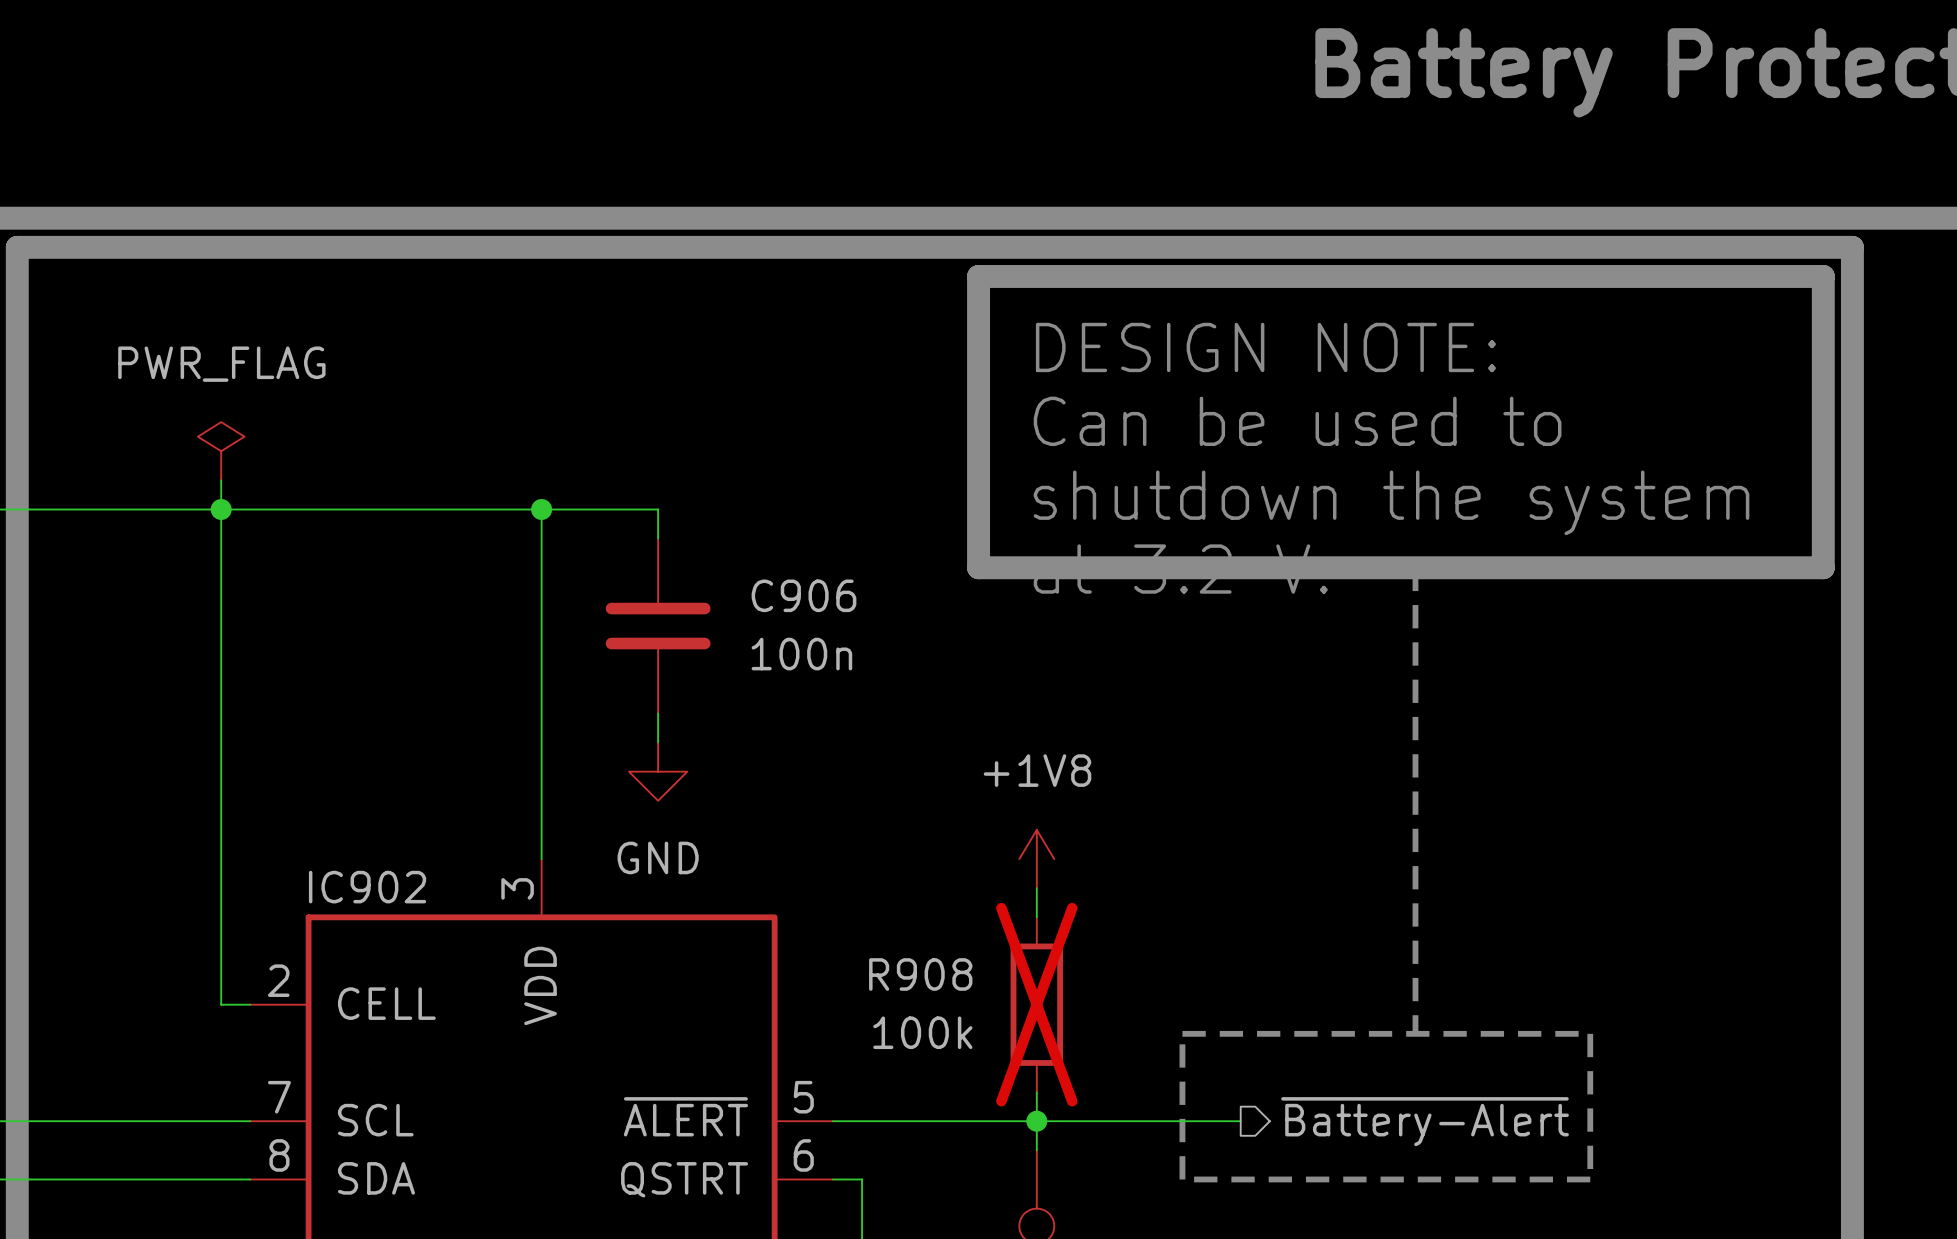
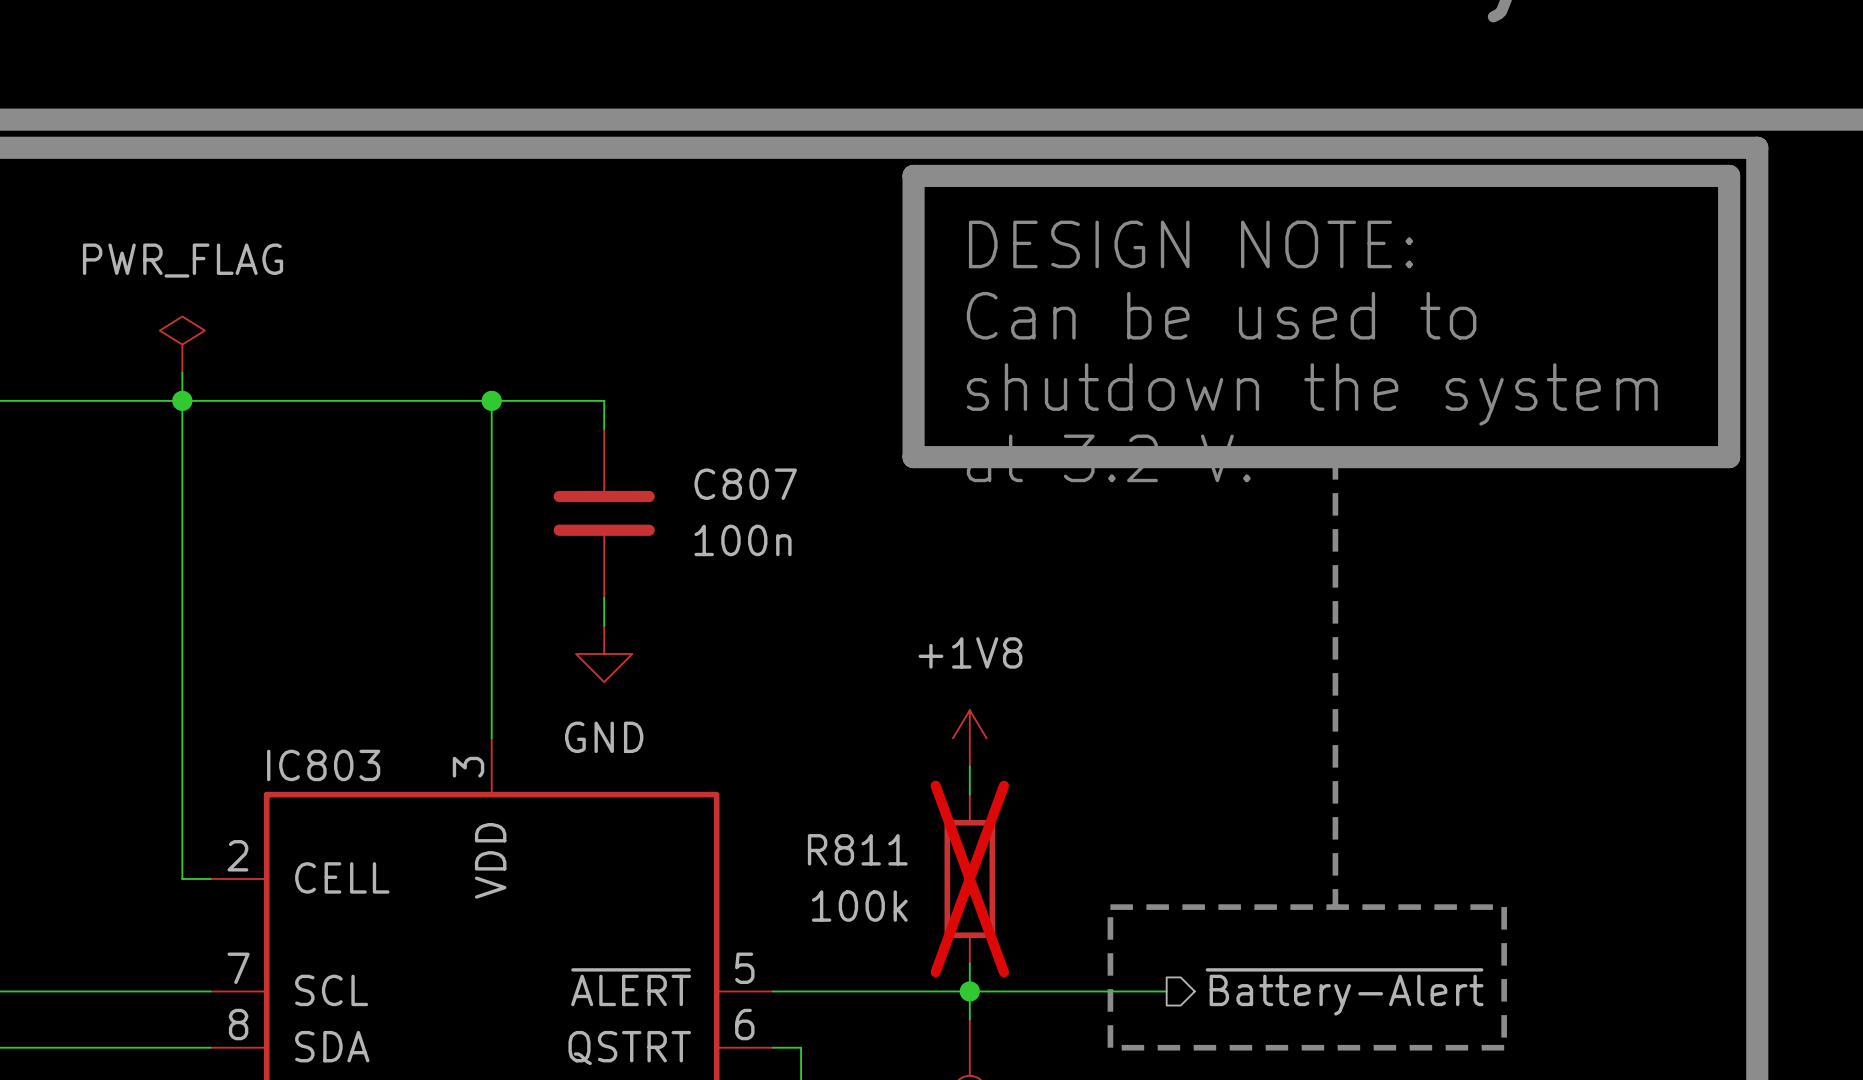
C906 name: C906 (803, 595) -> C807 (745, 484)
IC902 name: IC902 (367, 887) -> IC803 (323, 765)
R908 name: R908 (920, 974) -> R811 (857, 849)

